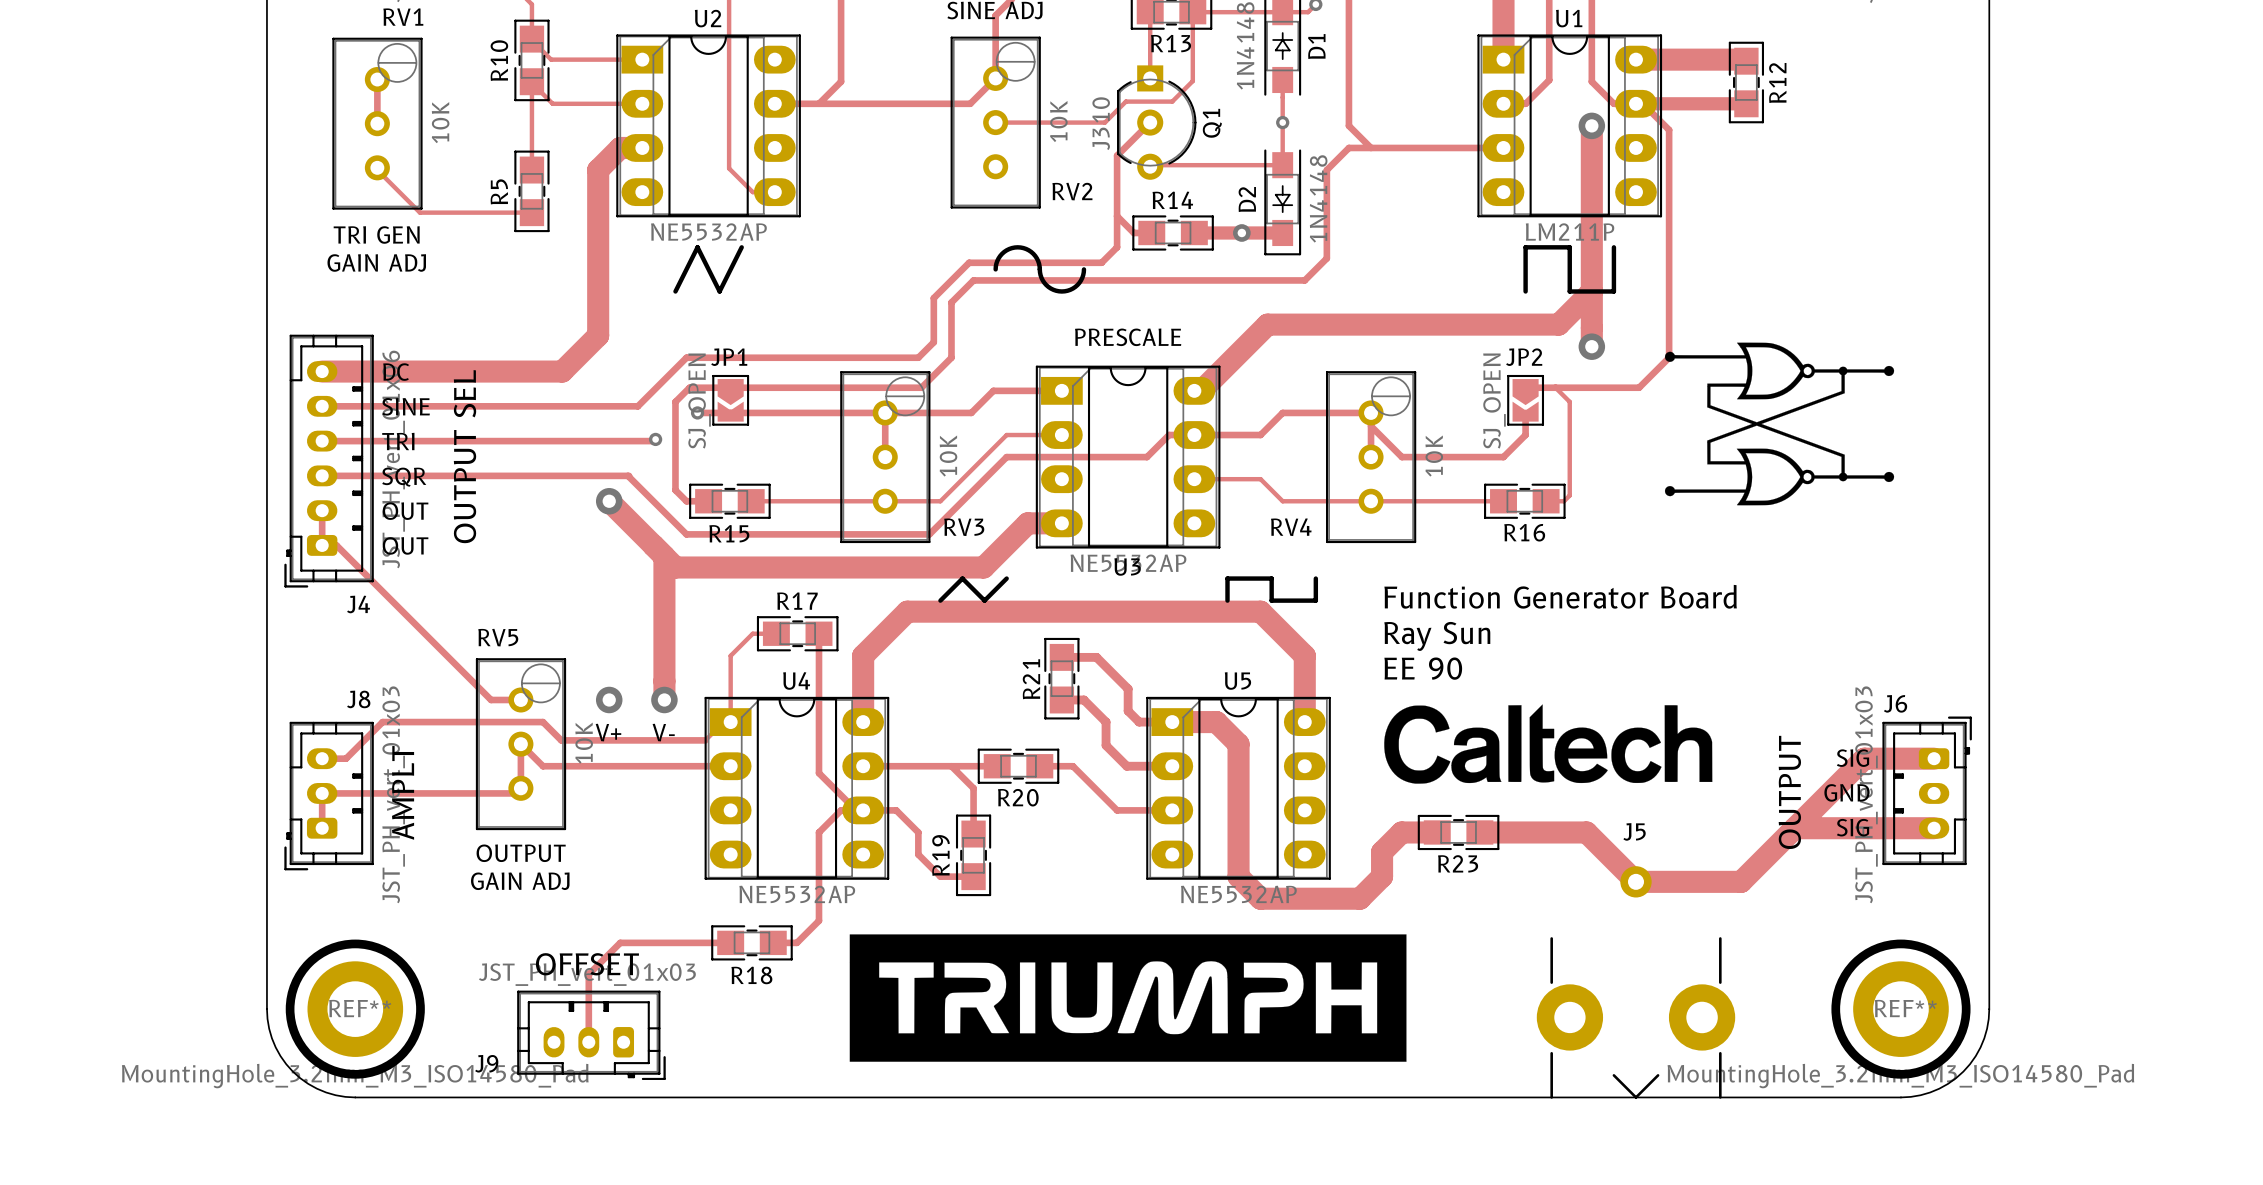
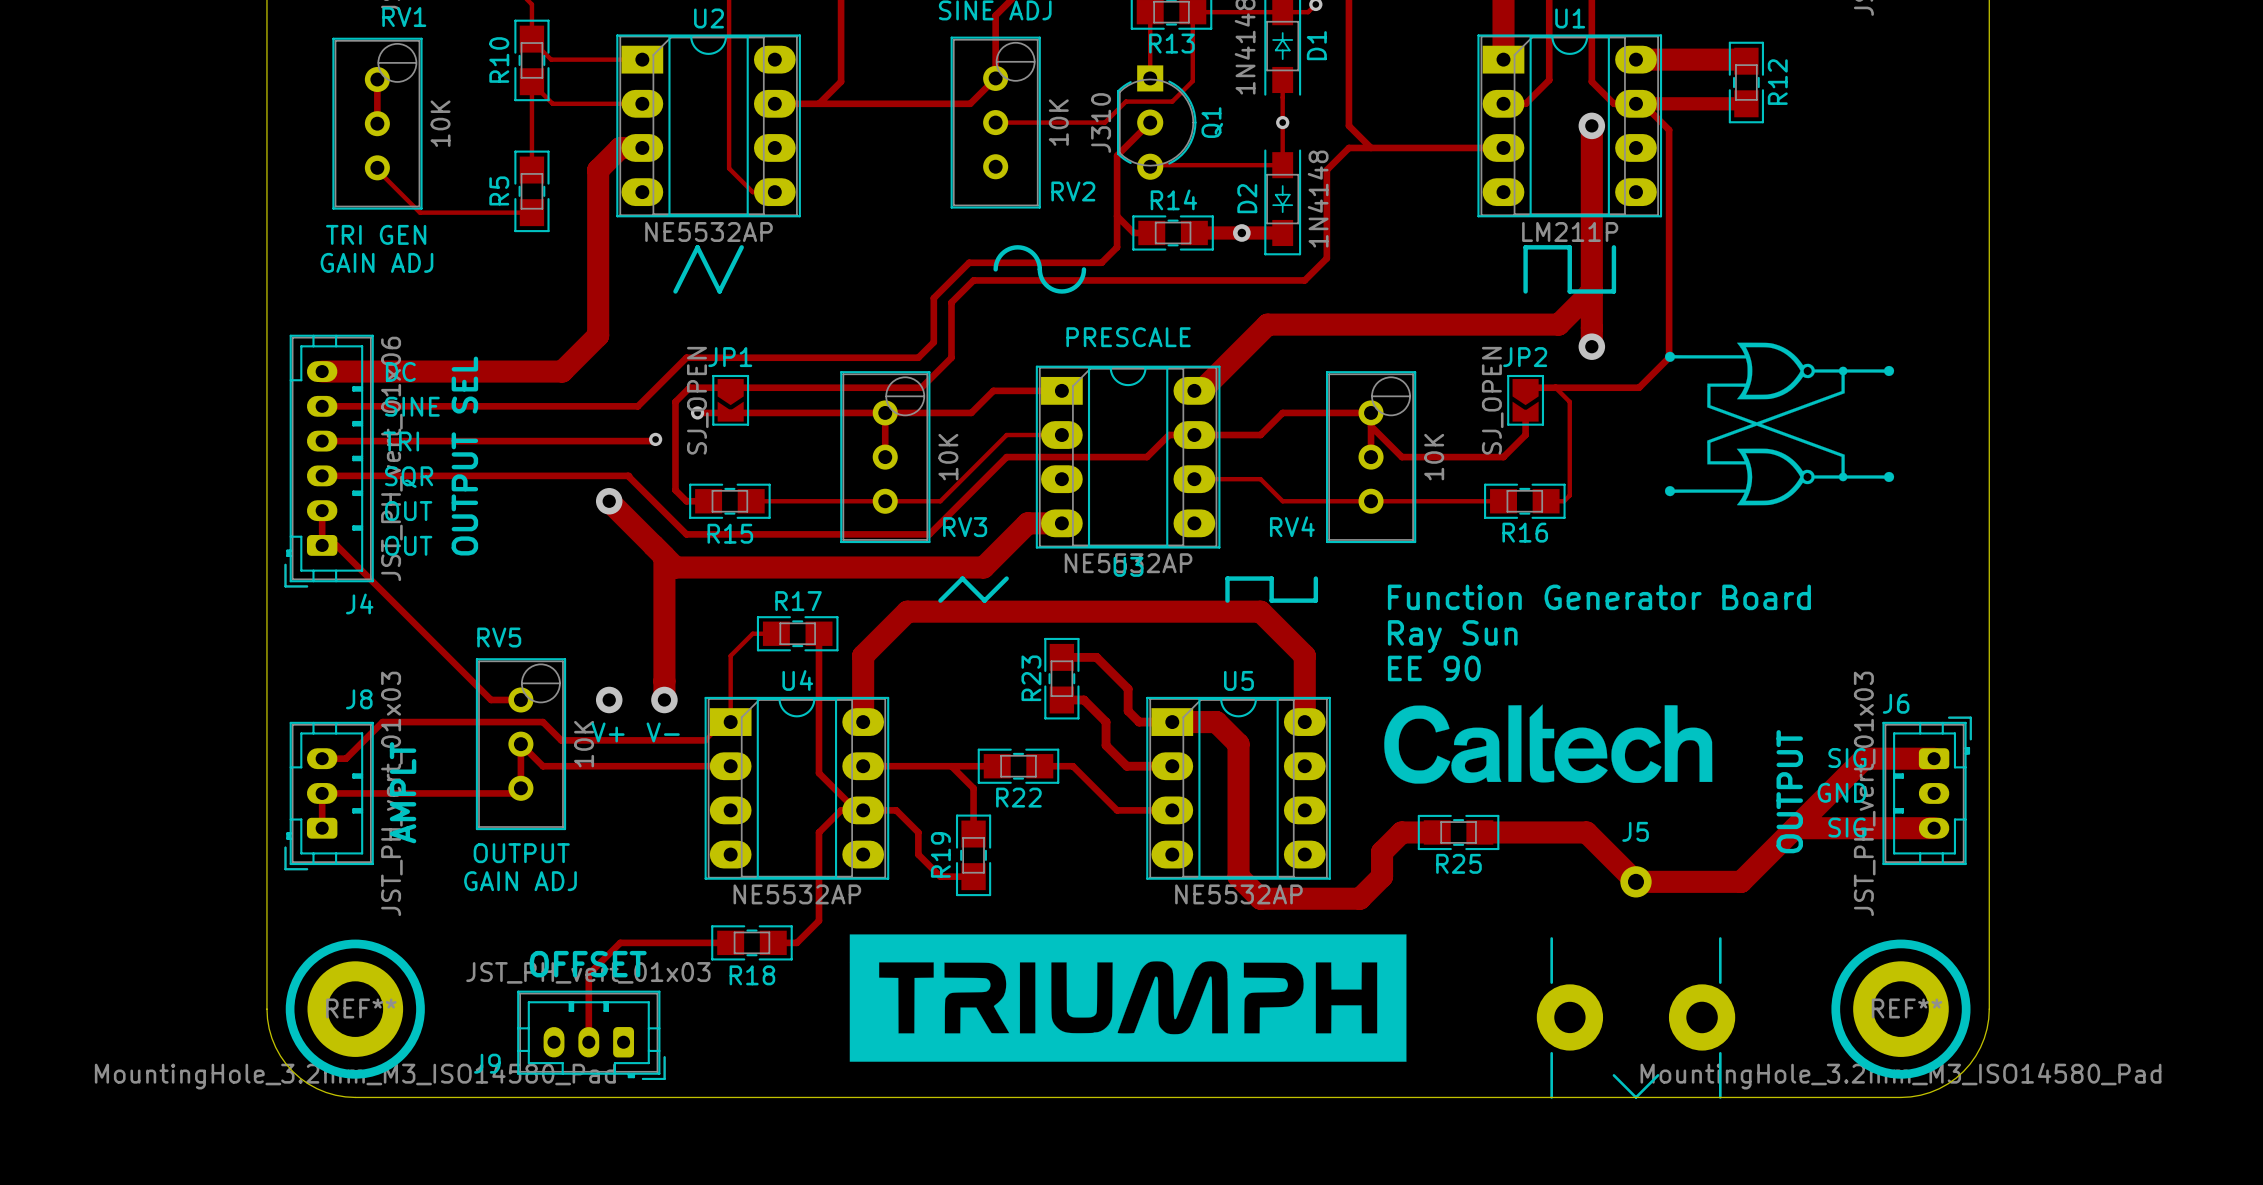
R21 name: R21 (1031, 679) -> R23 (1031, 678)
R20 name: R20 (1018, 797) -> R22 (1018, 797)
R23 name: R23 (1458, 863) -> R25 (1458, 863)

